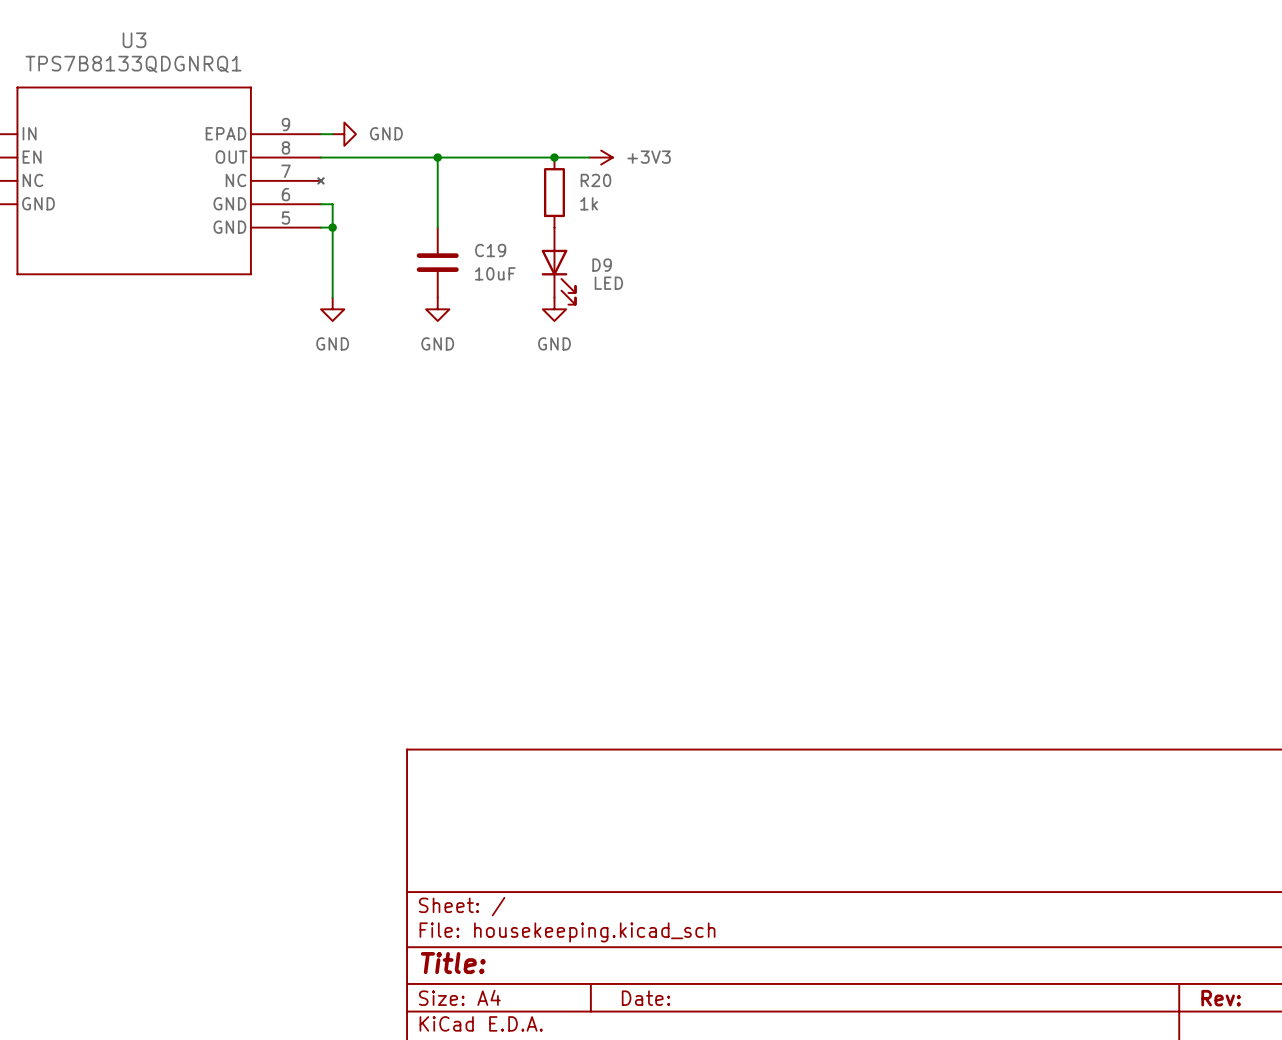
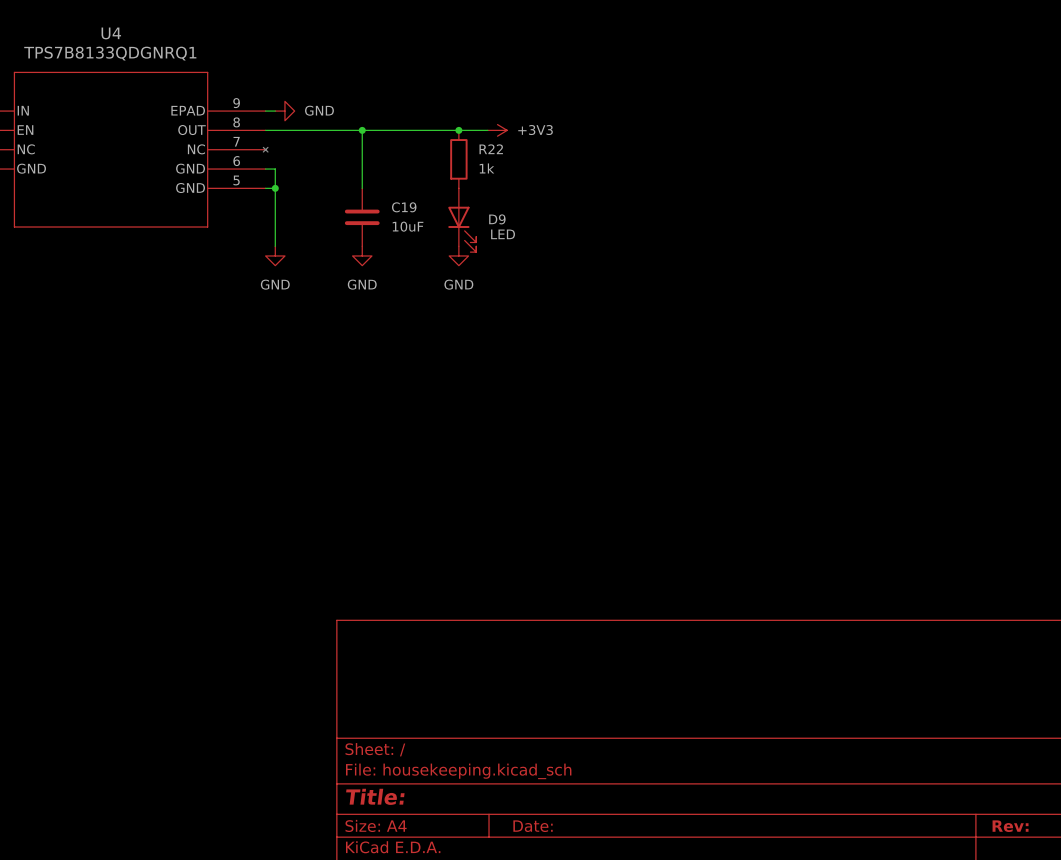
U3 name: U3 (134, 40) -> U4 (111, 33)
R20 name: R20 (595, 180) -> R22 (491, 149)

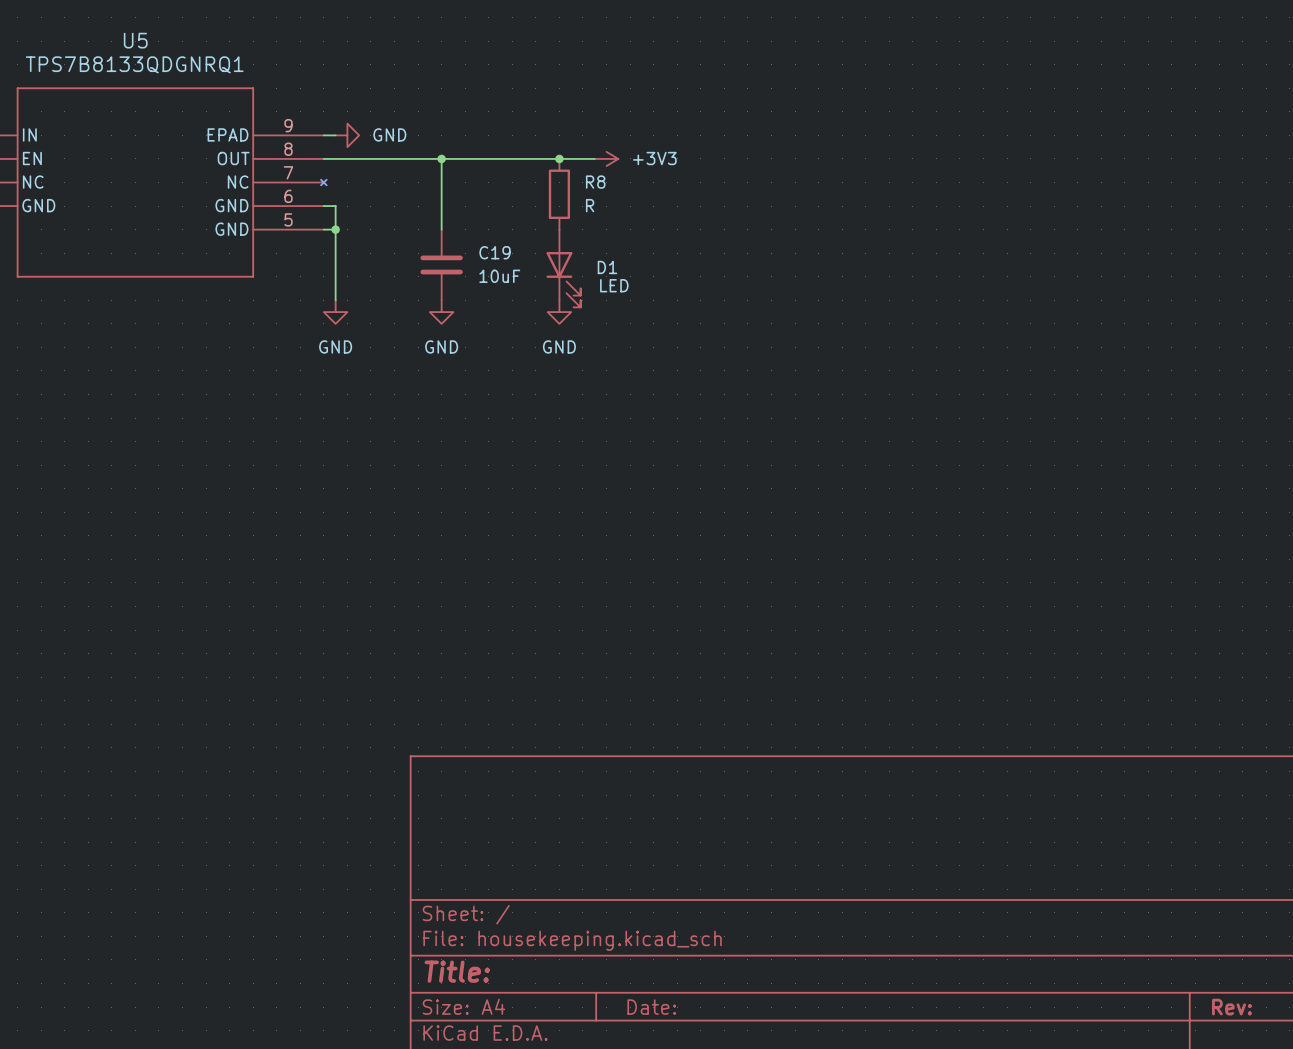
U4 name: U4 (111, 33) -> U5 (135, 40)
R22 name: R22 (491, 149) -> R8 (595, 182)
R22 value: 1k (486, 168) -> R (590, 205)
D9 name: D9 (497, 219) -> D1 (607, 267)

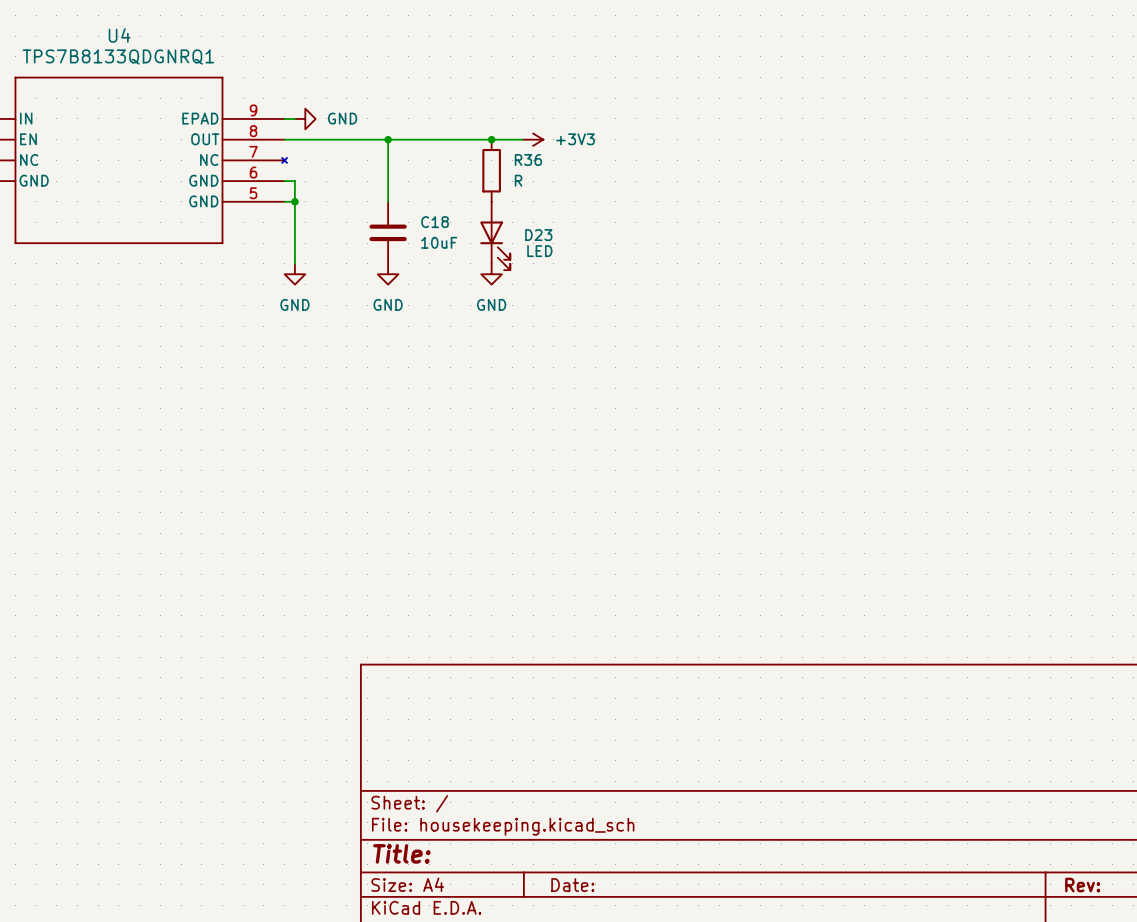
U5 name: U5 (135, 40) -> U4 (119, 35)
R8 name: R8 (595, 182) -> R36 (528, 160)
C19 name: C19 (495, 252) -> C18 (435, 222)
D1 name: D1 (607, 267) -> D23 (538, 235)

